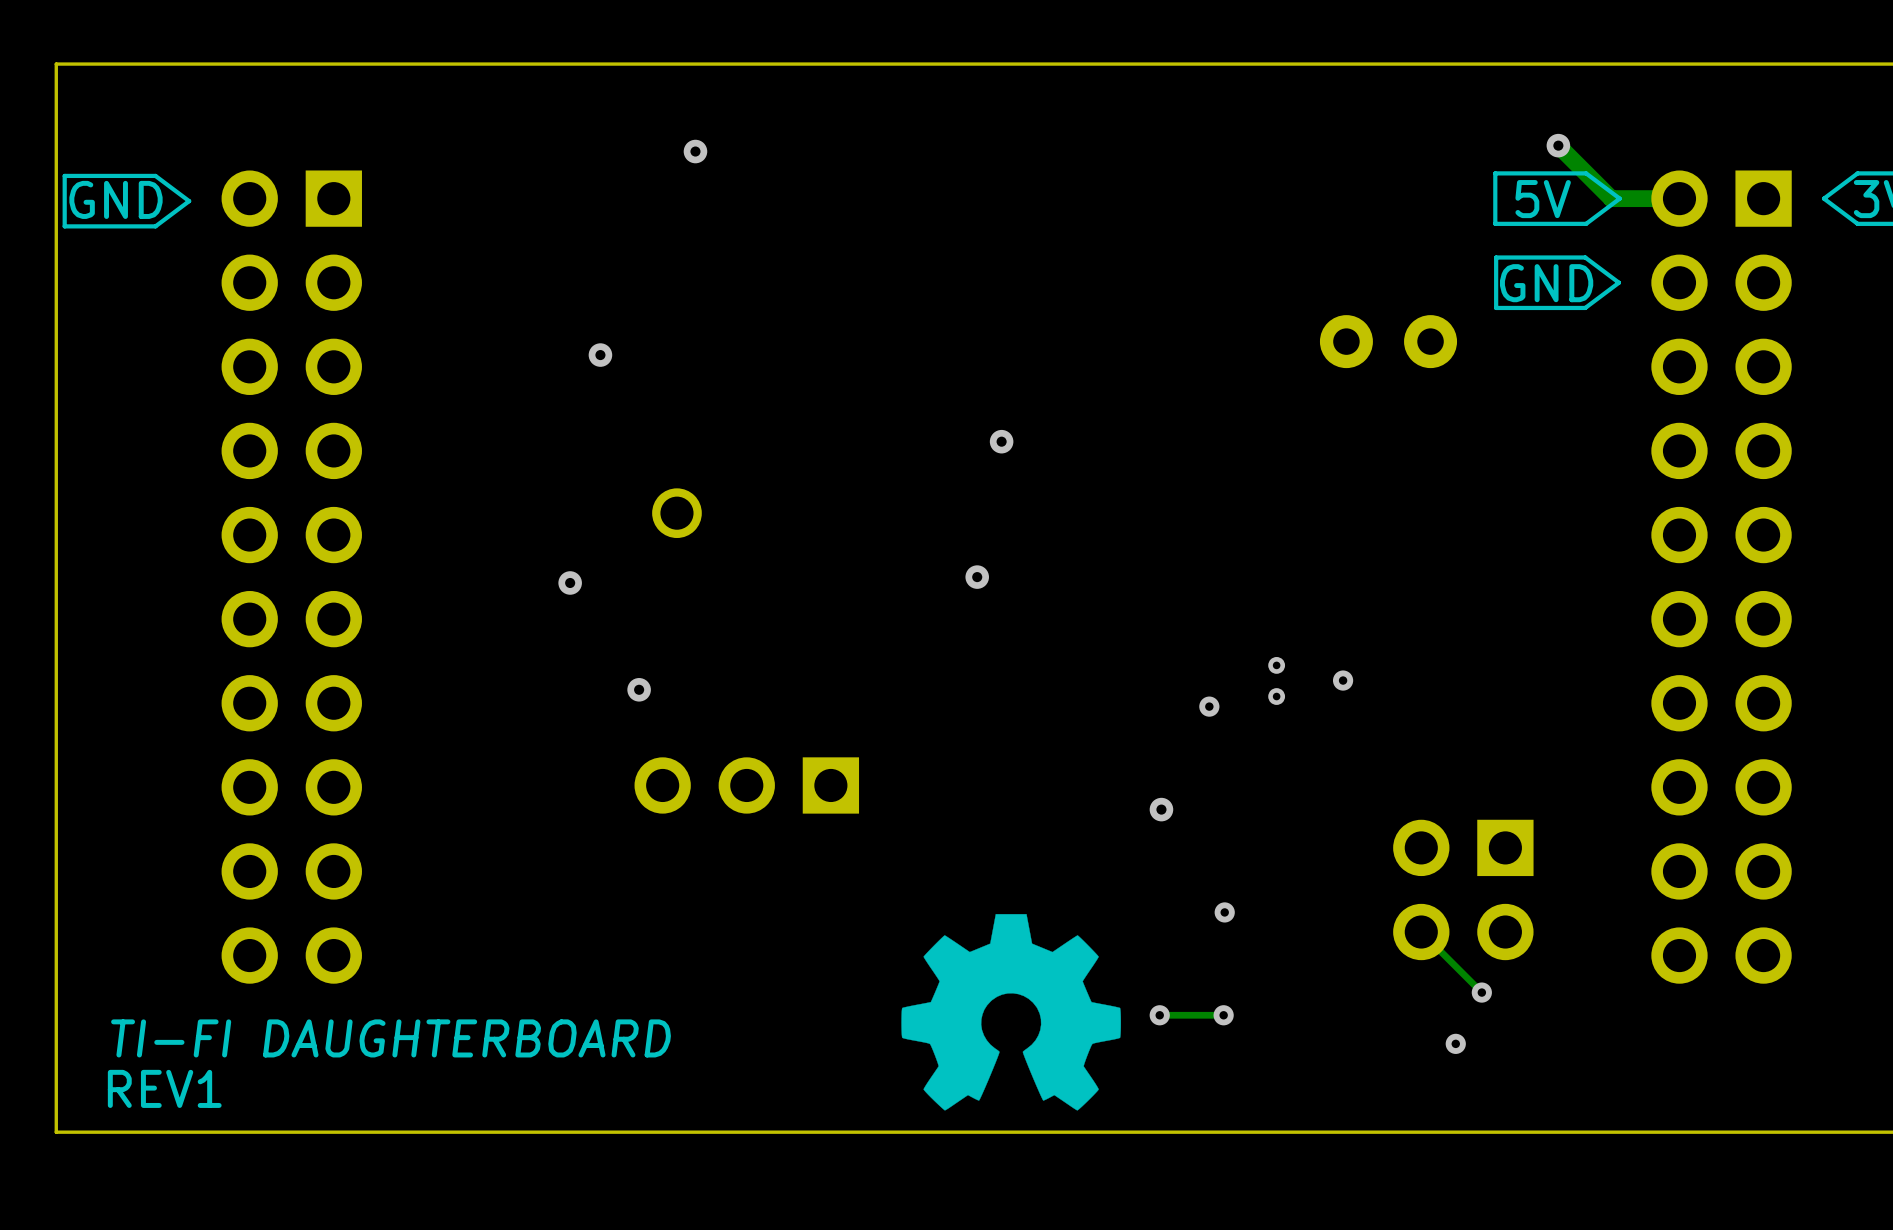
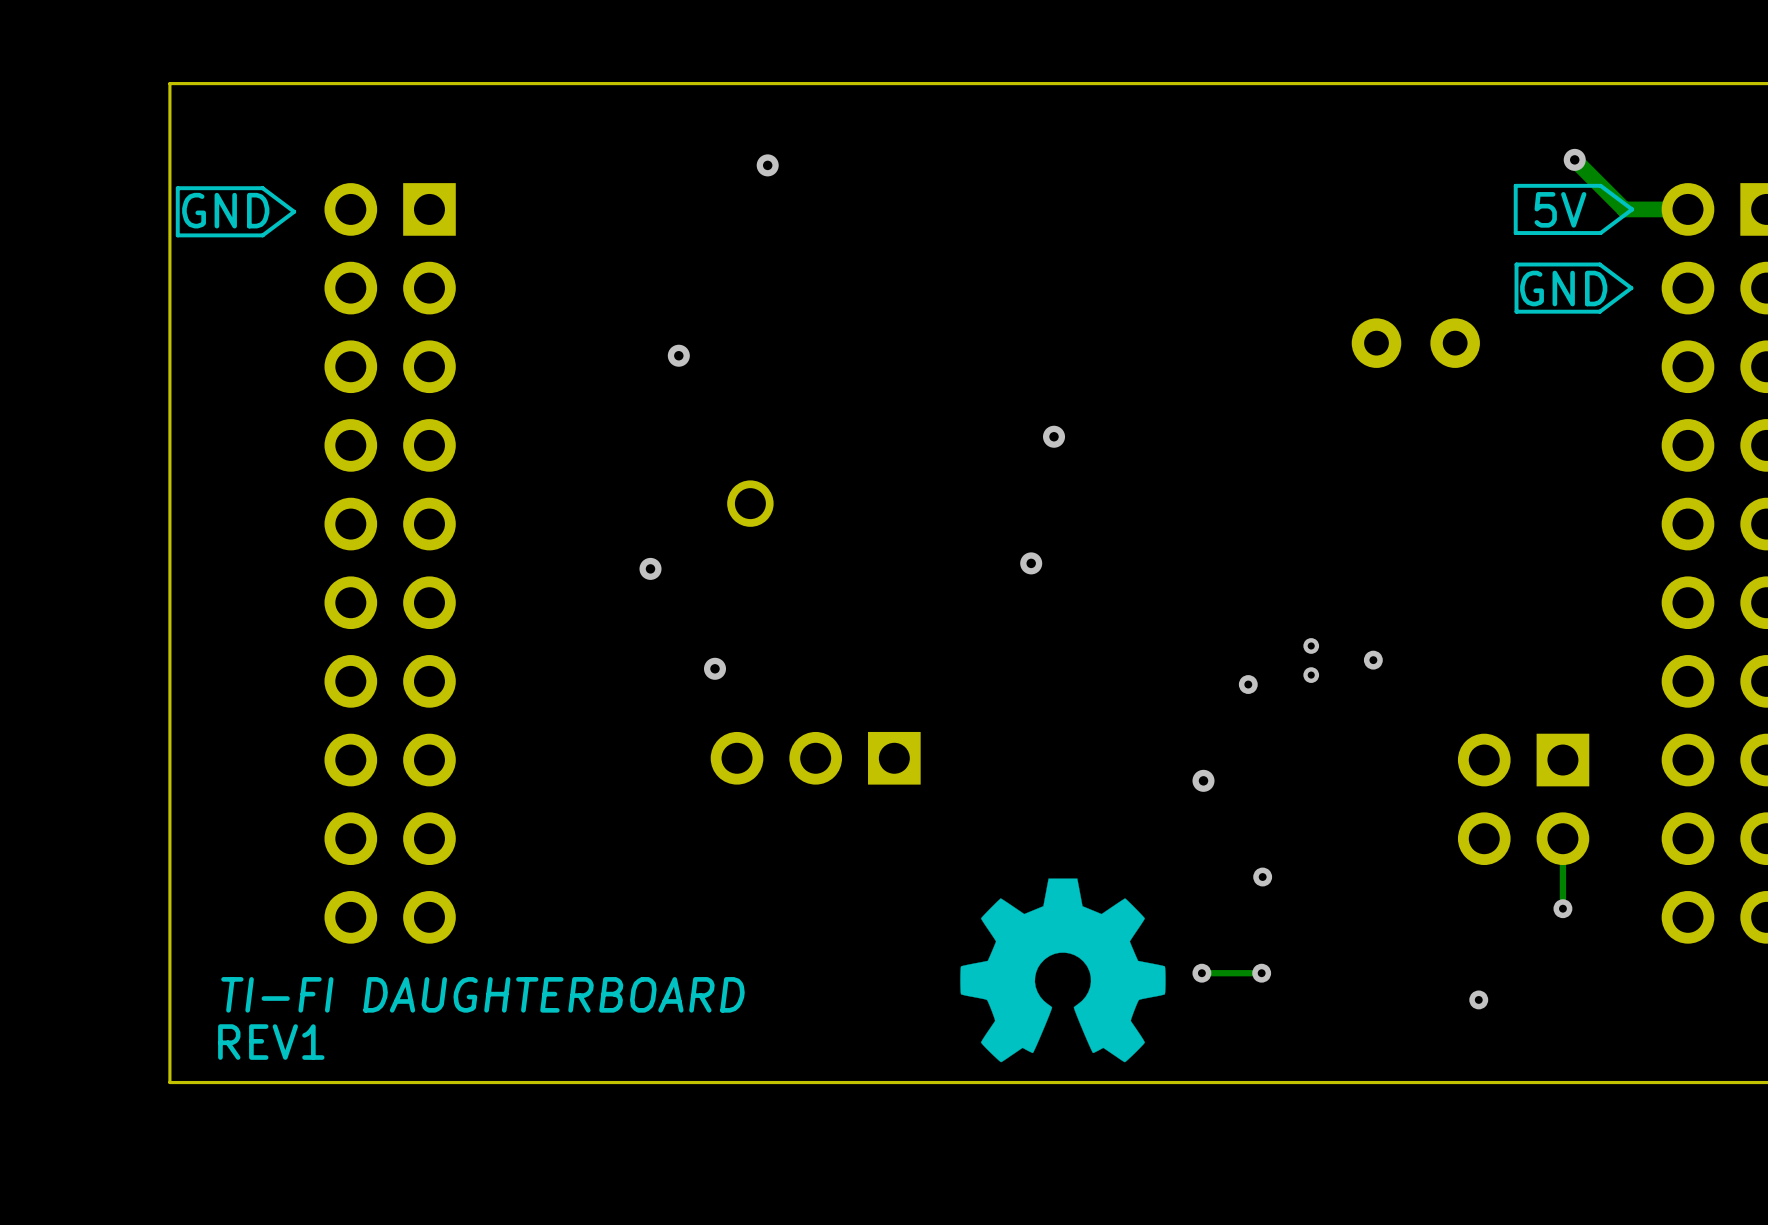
track: none -> (1562, 838) (1562, 908)
part position: (1463, 889) -> (1523, 799)
track: (1421, 932) (1481, 992) -> none
via position: (1481, 992) -> (1562, 908)

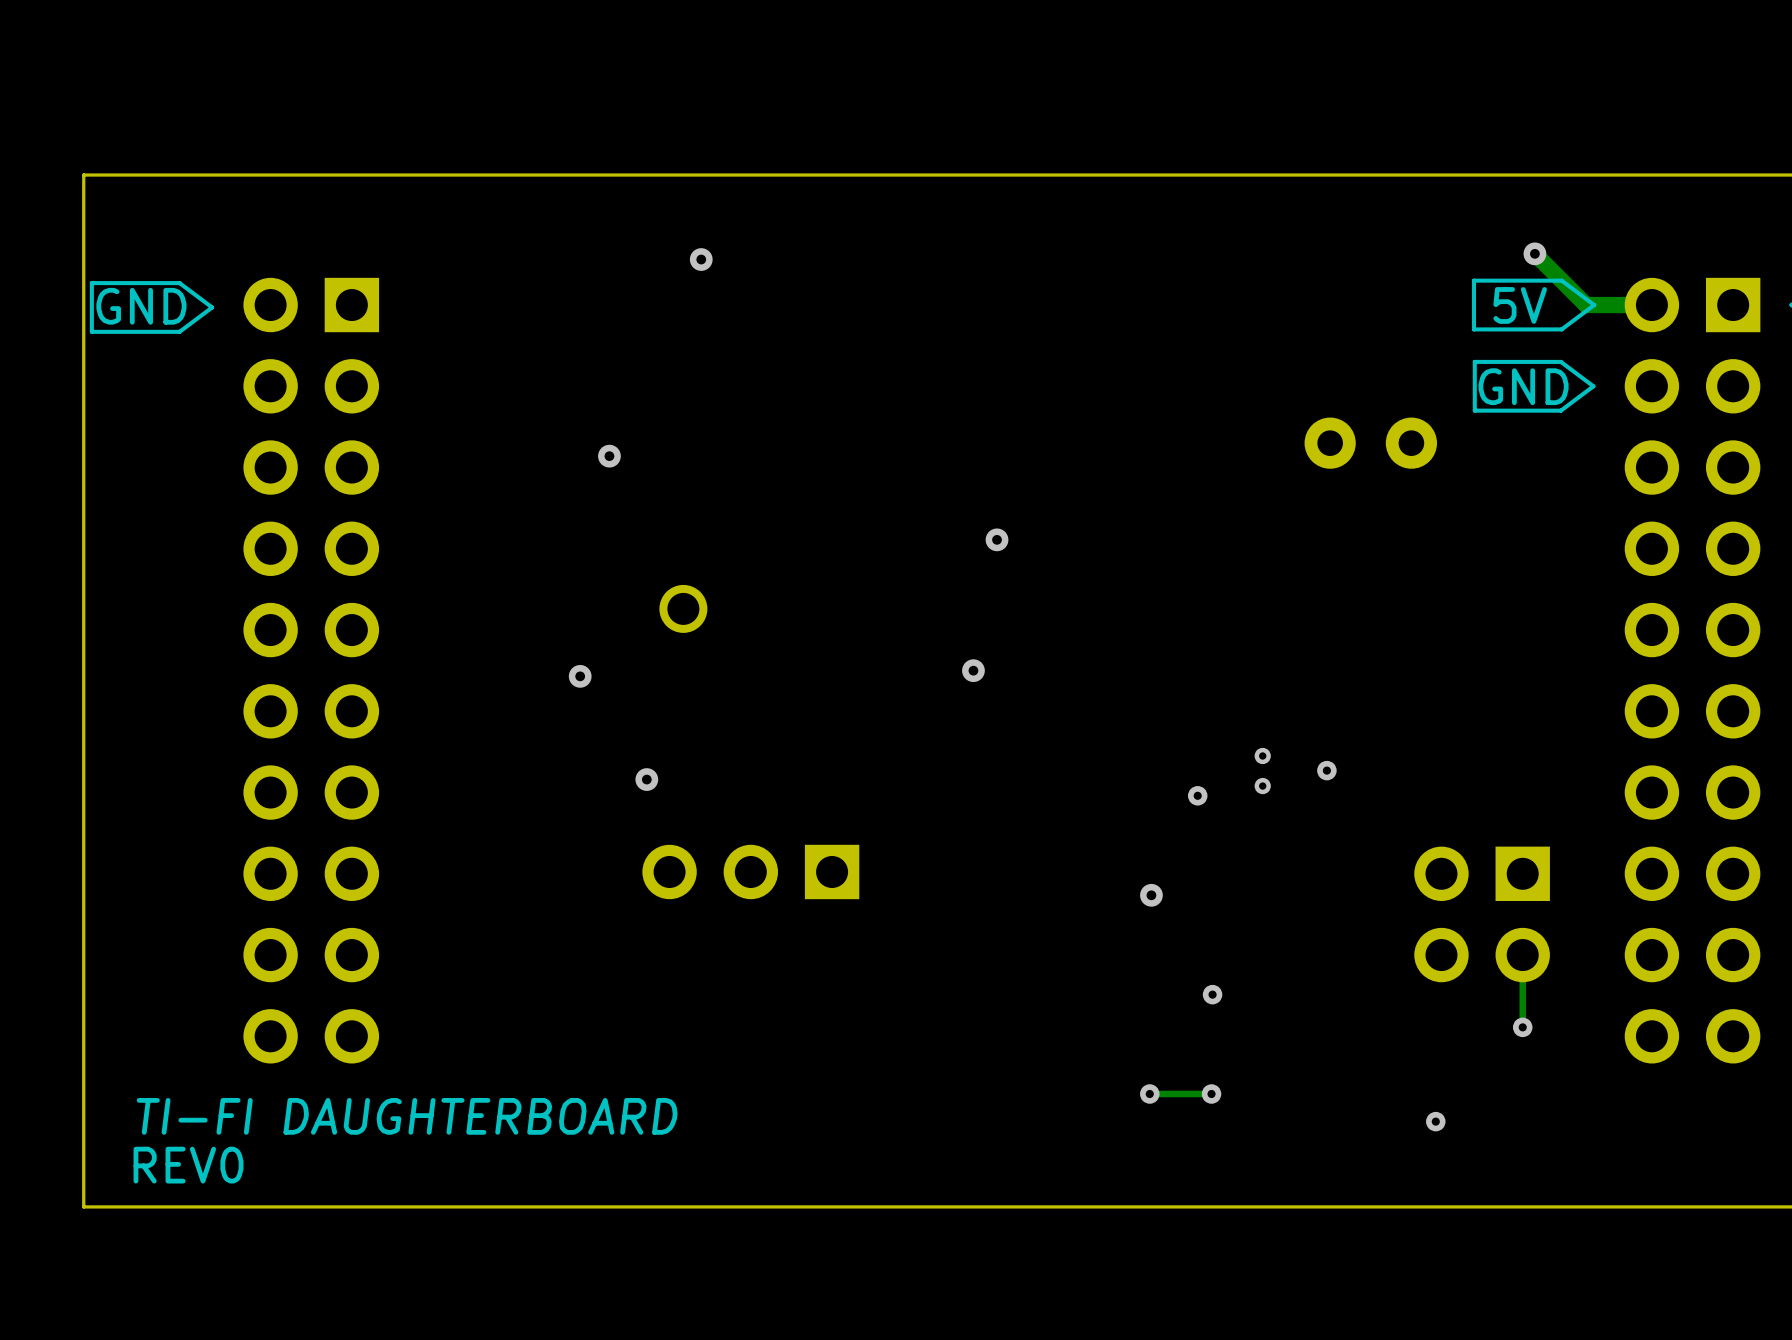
drawing: [960, 878, 1166, 1063] -> none
text: REV1 (271, 1042) -> REV0 (188, 1165)

